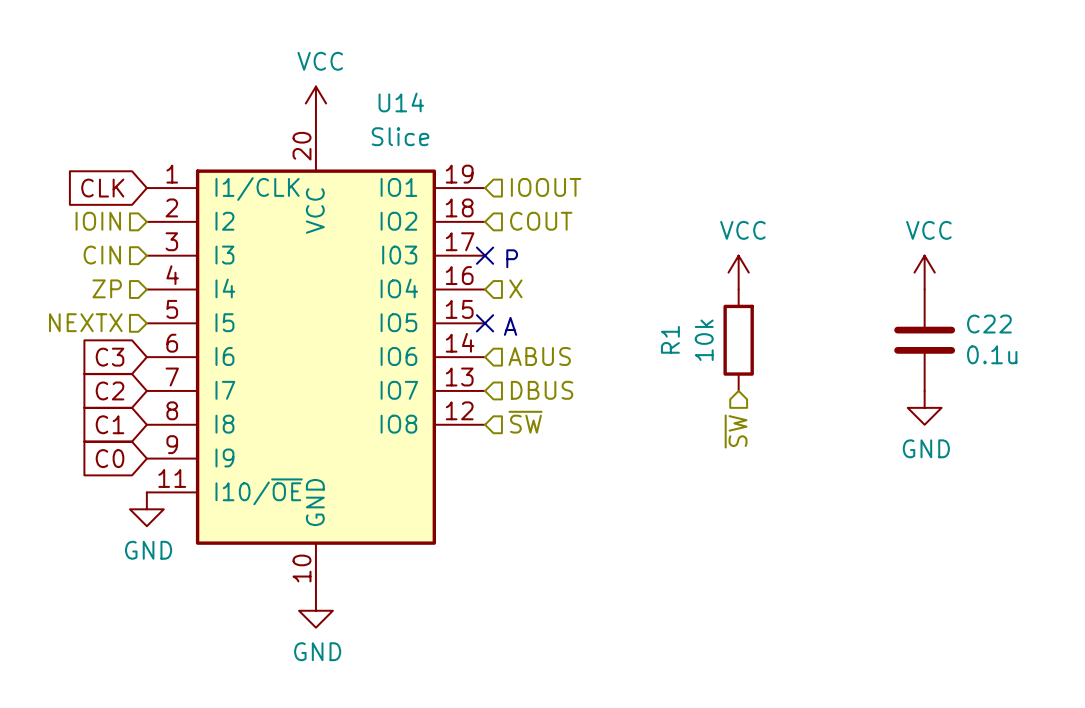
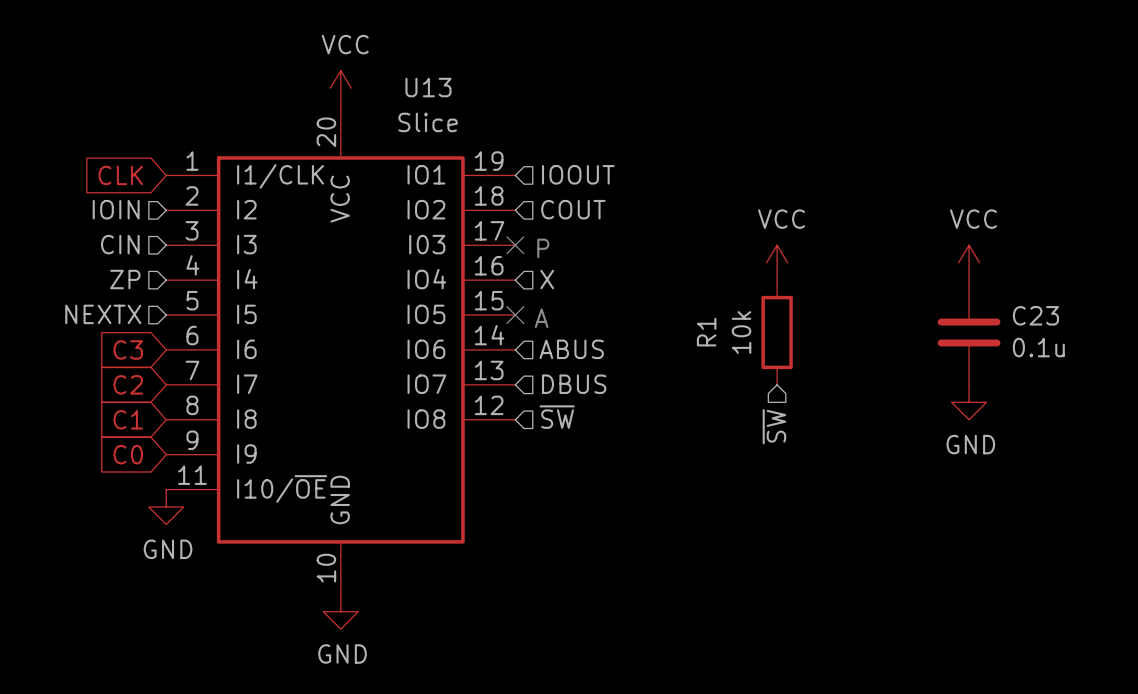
U14 name: U14 (401, 102) -> U13 (428, 87)
C22 name: C22 (989, 324) -> C23 (1035, 315)

